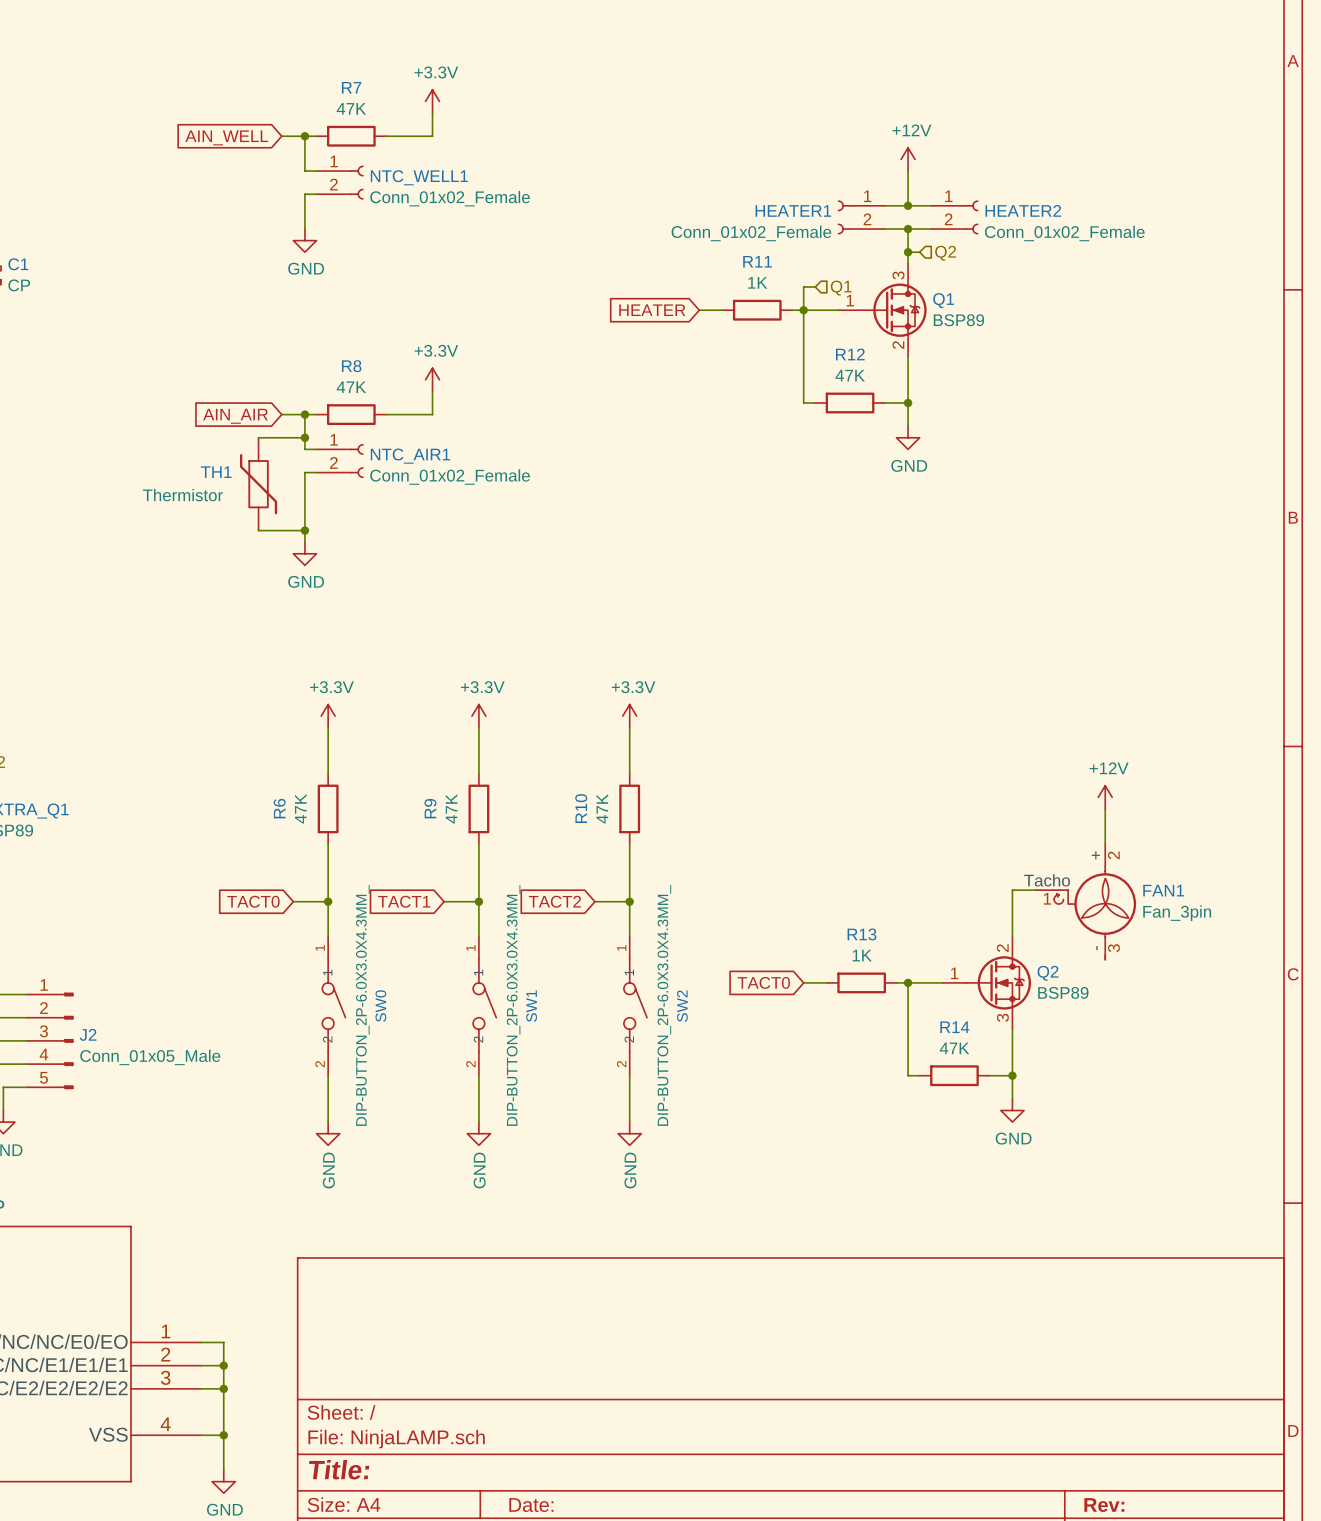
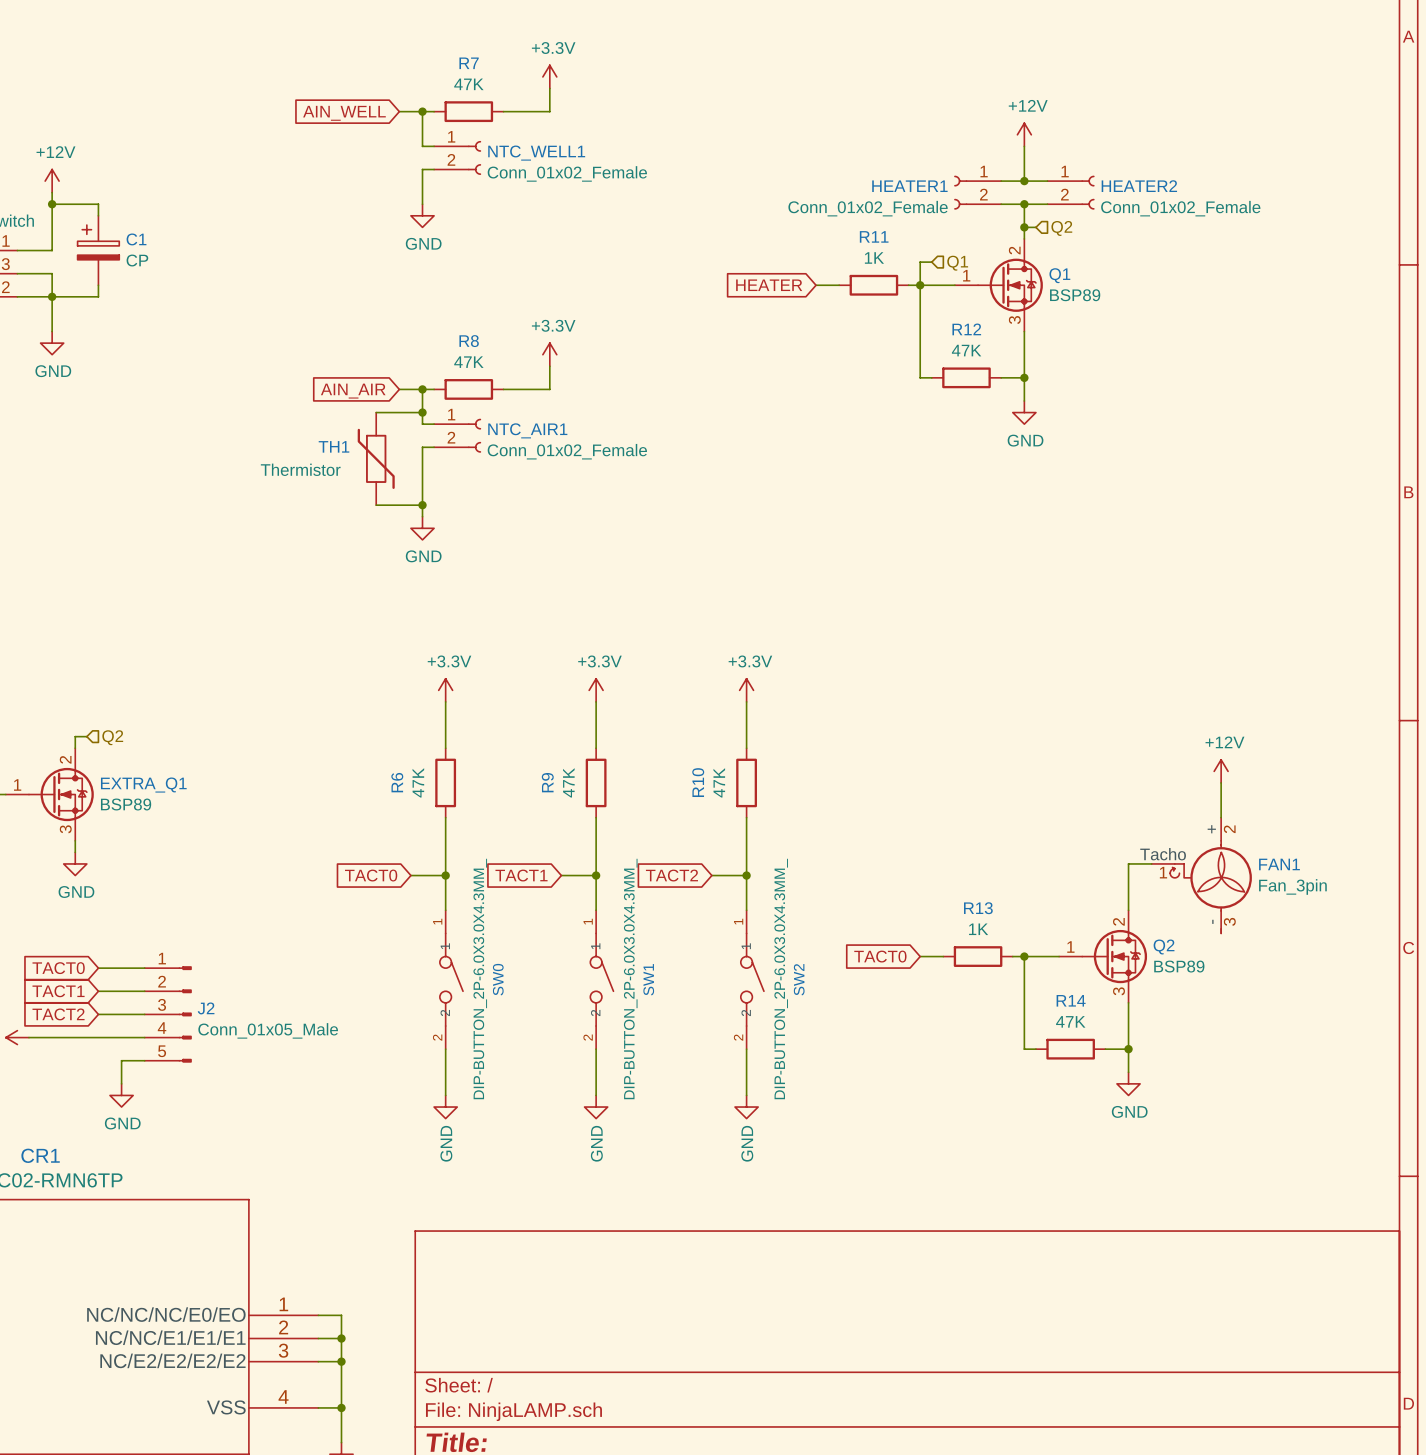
Q1 pin number: 3 (898, 275) -> 2 (1014, 250)
Q1 pin number: 2 (898, 345) -> 3 (1014, 320)

